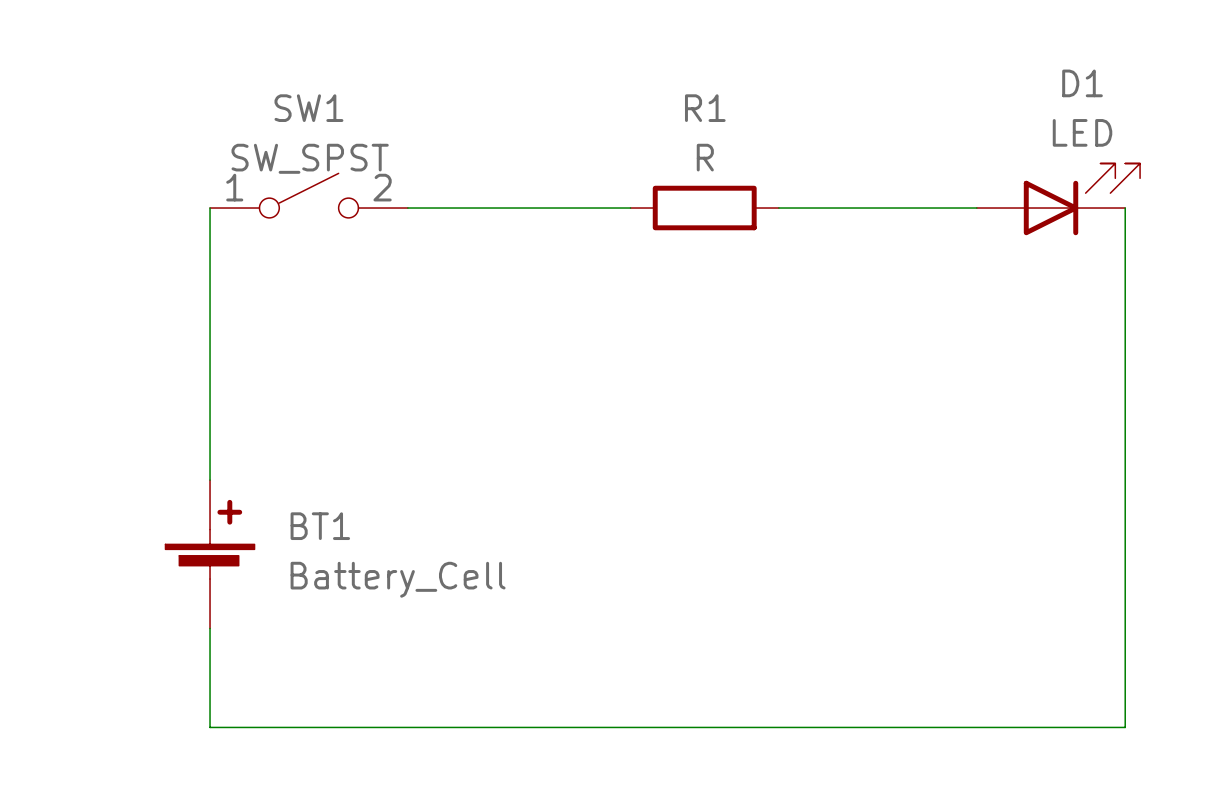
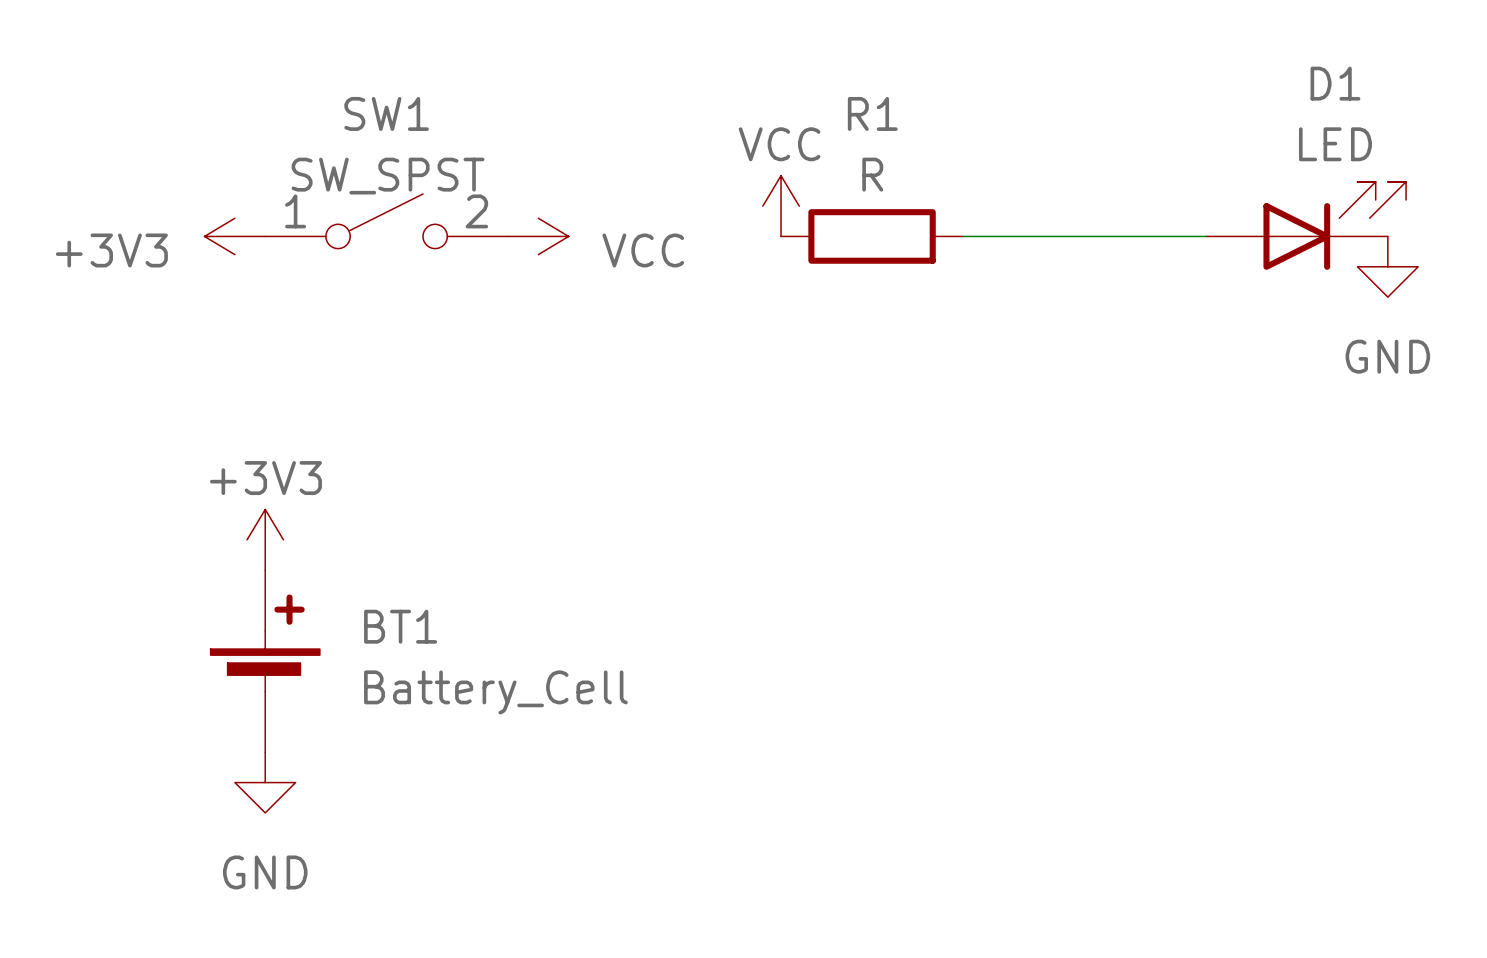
power symbol: none -> VCC (781, 206)
power symbol: none -> +3V3 (234, 236)
wire: (210, 208) (210, 480) -> none
wire: (407, 208) (630, 208) -> none
power symbol: none -> VCC (538, 236)
wire: (1125, 208) (1125, 727) (210, 727) (210, 628) -> none
power symbol: none -> GND (1387, 266)
power symbol: none -> +3V3 (265, 539)
power symbol: none -> GND (265, 782)

